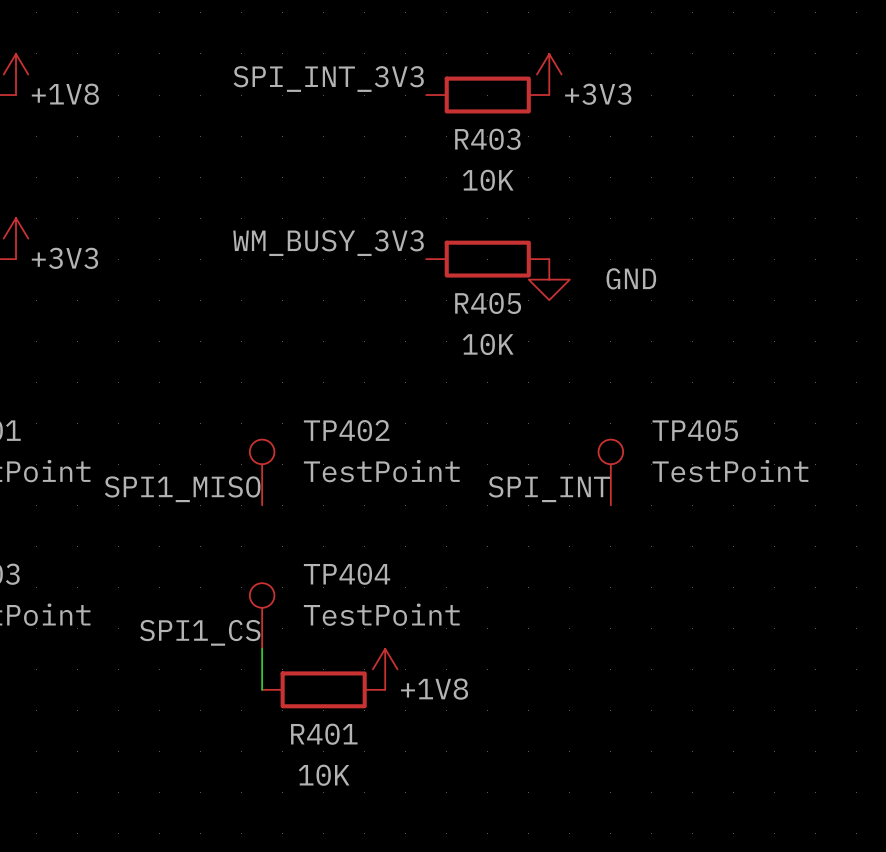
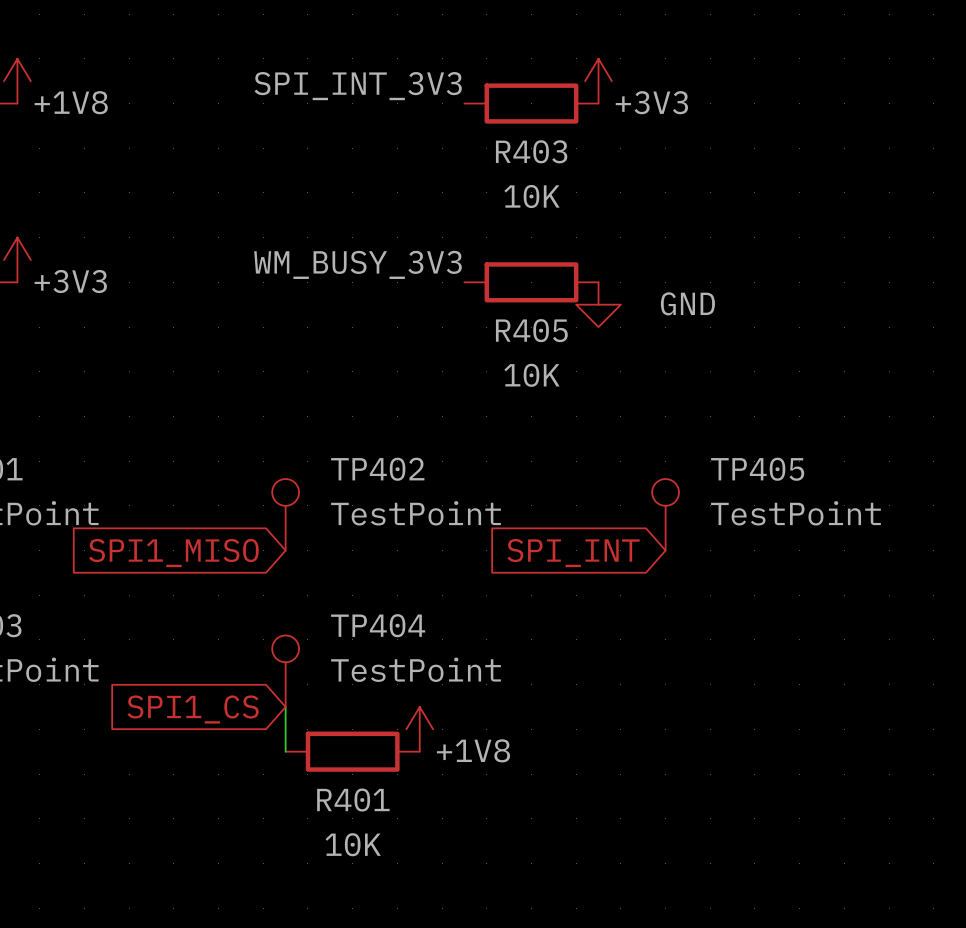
label: SPI1_MISO (182, 489) -> none
label: SPI_INT (549, 489) -> none
global label: none -> SPI1_MISO (173, 553)
global label: none -> SPI_INT (573, 553)
label: SPI1_CS (200, 632) -> none
global label: none -> SPI1_CS (193, 709)

